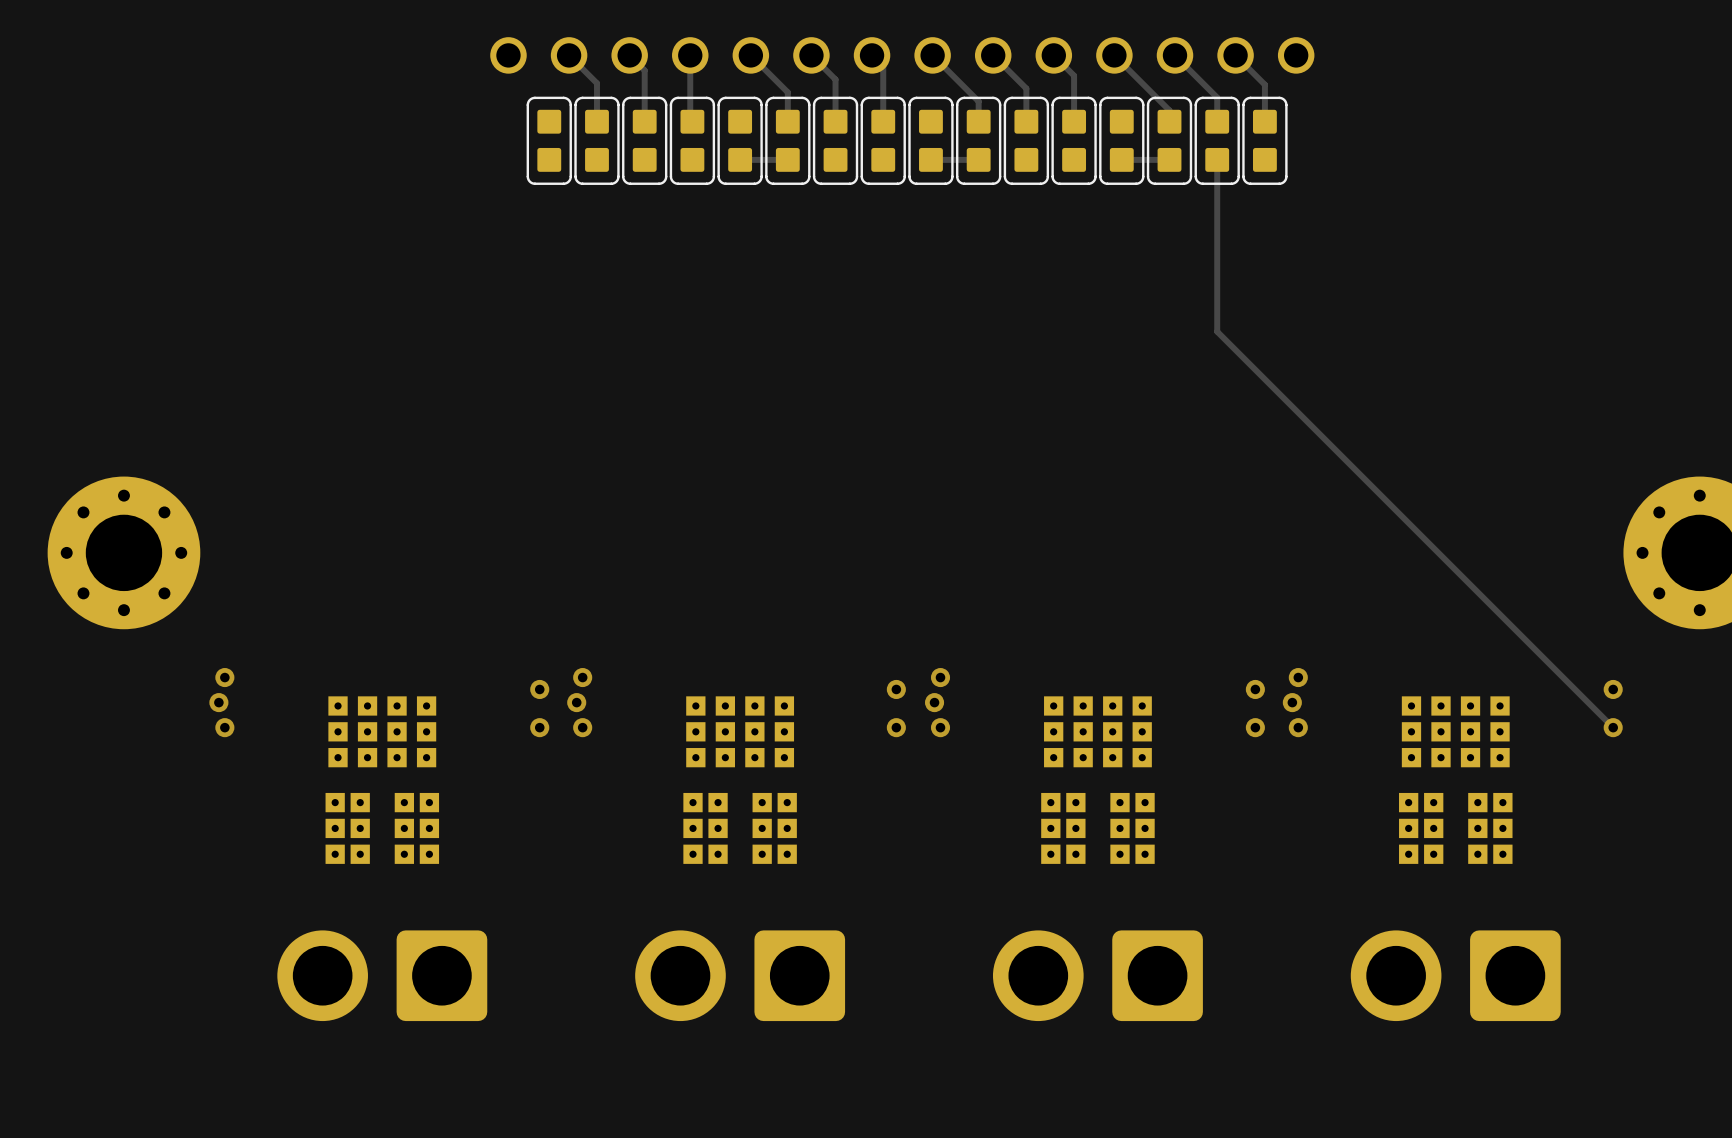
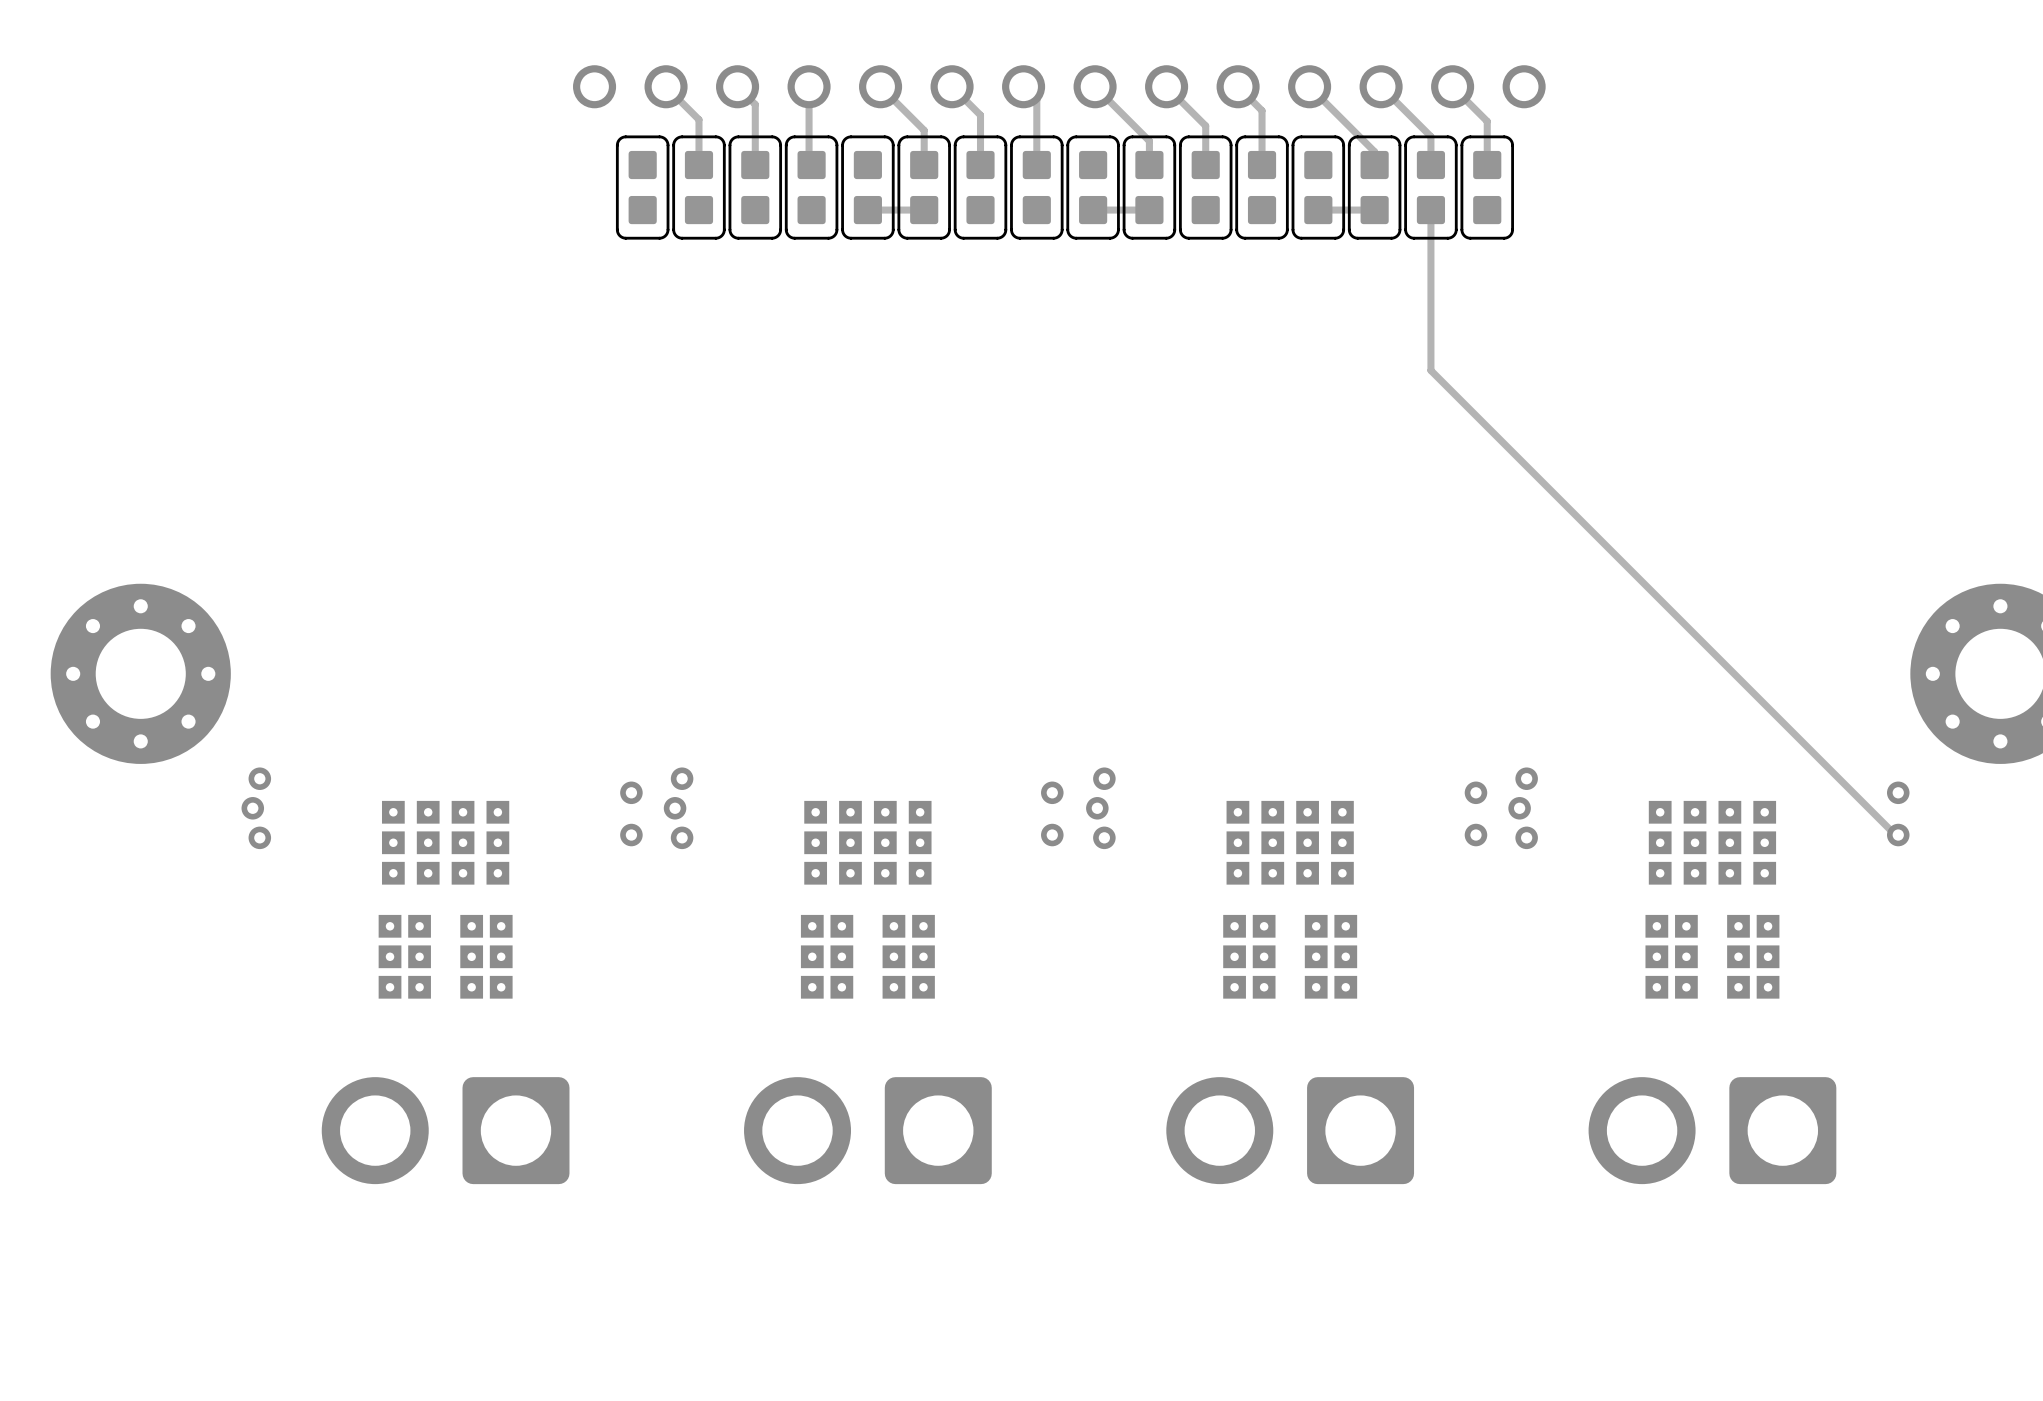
track: (1217, 295) (1217, 331) (1613, 727) -> (1430, 370) (1898, 837)
via: none -> (259, 778)
via: none -> (682, 778)
via: none -> (1104, 778)
via: none -> (1526, 778)
via: none -> (631, 792)
via: none -> (1052, 792)
via: none -> (1475, 792)
via: none -> (252, 808)
via: none -> (675, 808)
via: none -> (1097, 808)
via: none -> (1519, 808)
via: (224, 677) -> none
via: (582, 677) -> none
via: (940, 677) -> none
via: (1298, 677) -> none
via: none -> (259, 837)
via: none -> (682, 837)
via: none -> (1104, 837)
via: none -> (1526, 837)
via: (218, 702) -> none
via: (576, 702) -> none
via: (934, 702) -> none
via: (1292, 702) -> none
via: (224, 727) -> none
via: (539, 727) -> none
via: (582, 727) -> none
via: (896, 727) -> none
via: (940, 727) -> none
via: (1255, 727) -> none
via: (1298, 727) -> none
via position: (1613, 727) -> (1898, 792)
part position: (382, 780) -> (445, 899)
part position: (740, 780) -> (867, 899)
part position: (1097, 780) -> (1290, 899)
part position: (1455, 780) -> (1712, 899)
part position: (382, 975) -> (445, 1130)
part position: (740, 975) -> (867, 1130)
part position: (1097, 975) -> (1290, 1130)
part position: (1455, 975) -> (1712, 1130)

